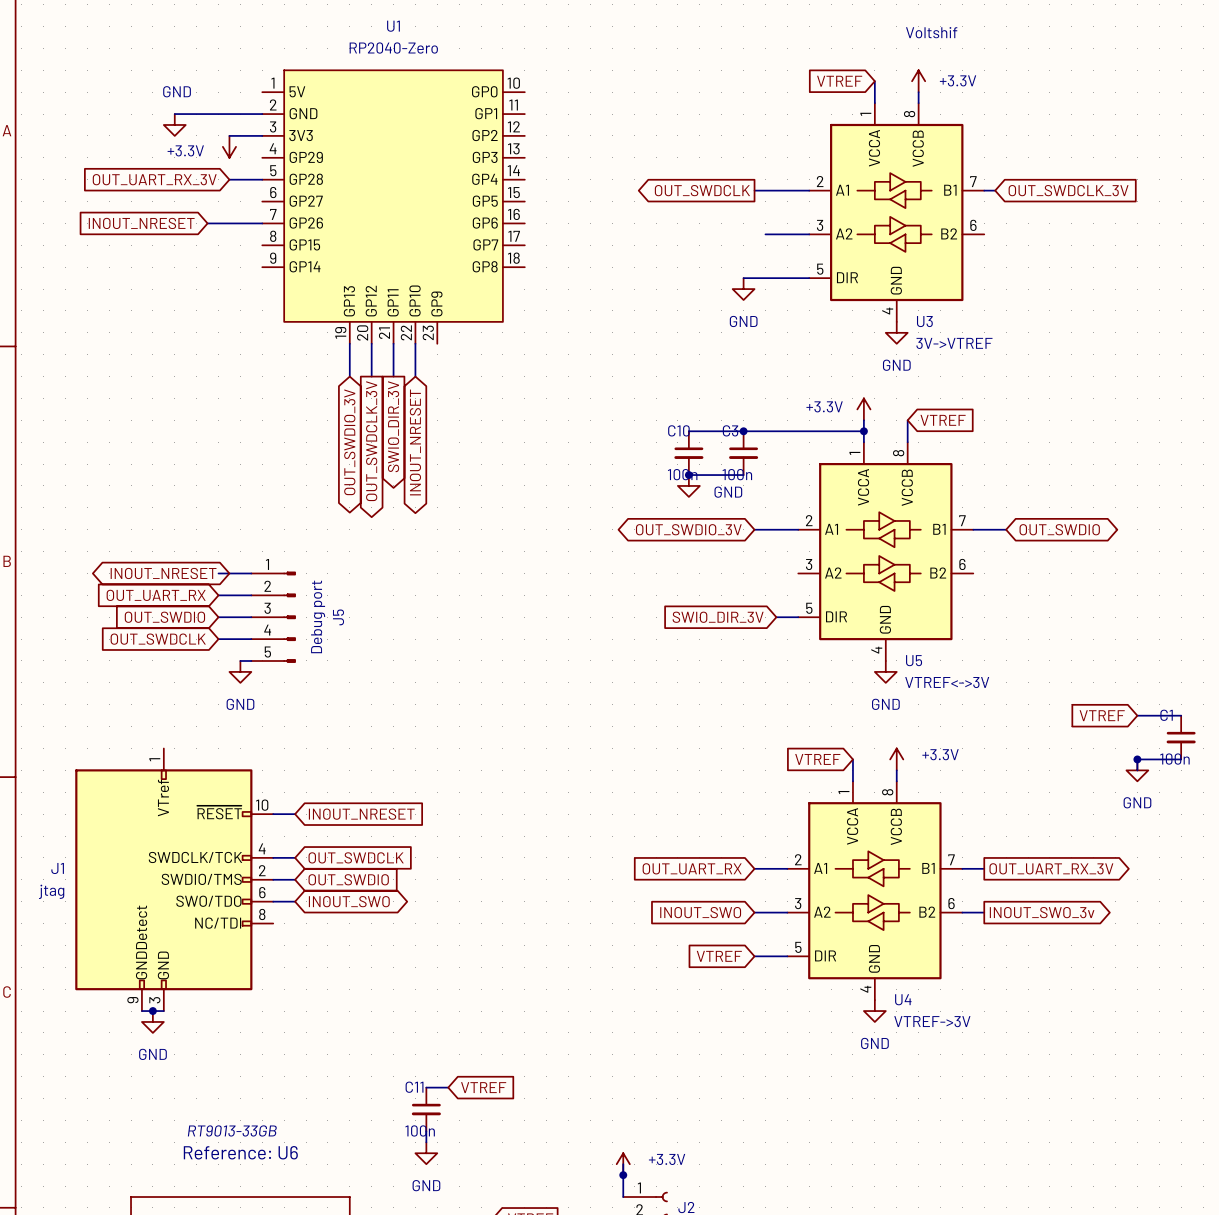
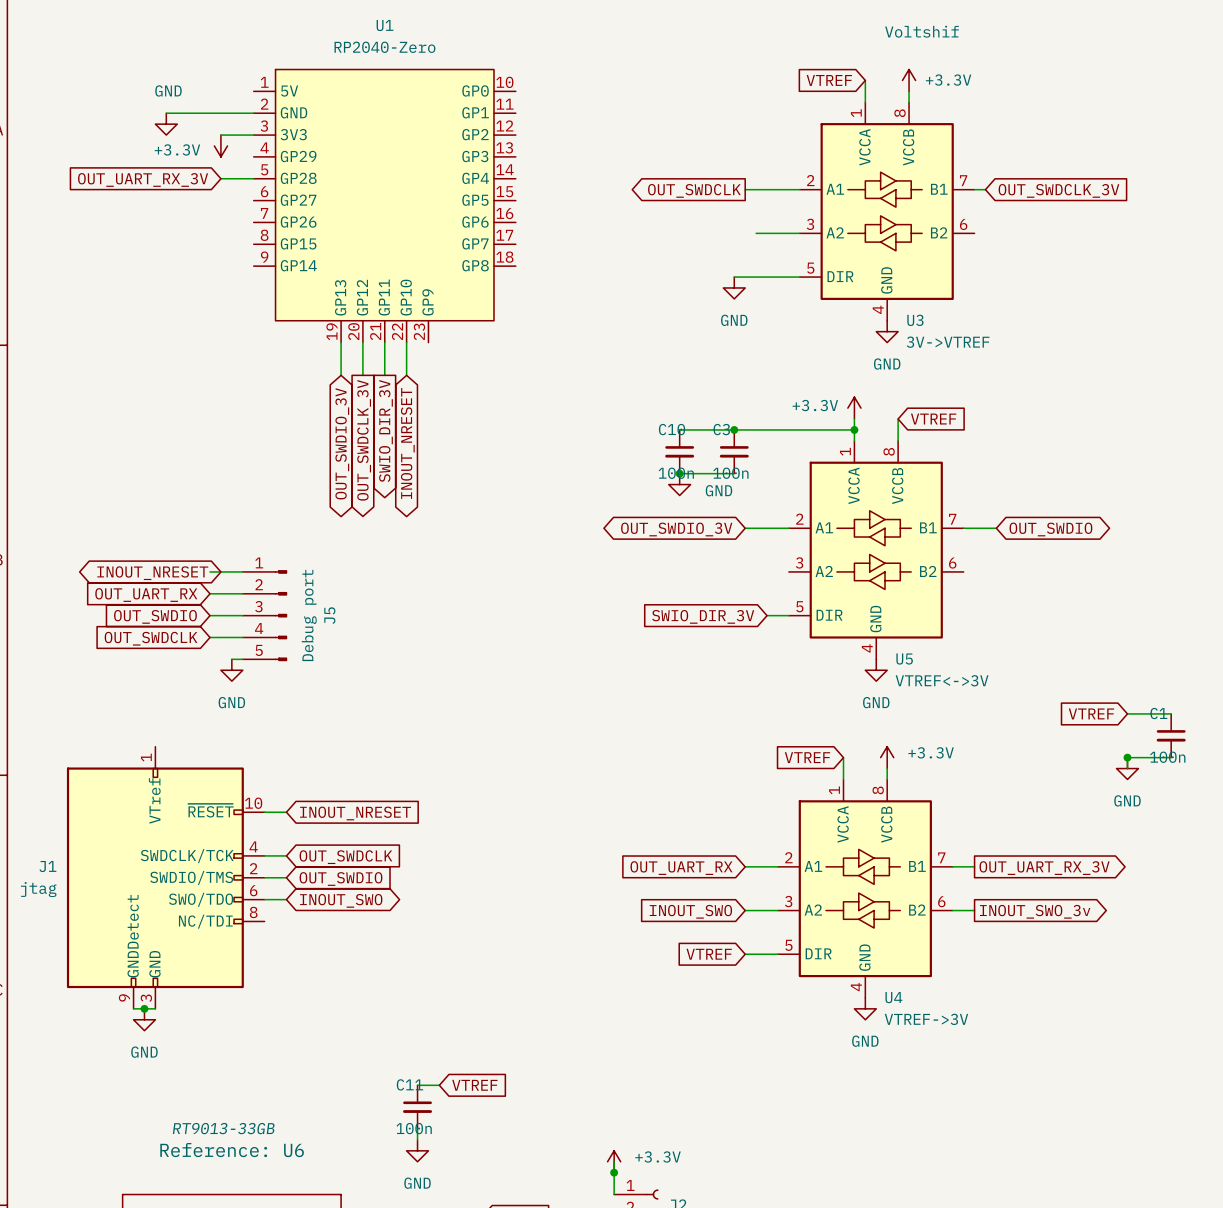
global label: INOUT_NRESET (141, 223) -> none
wire: (207, 223) (262, 223) -> none

